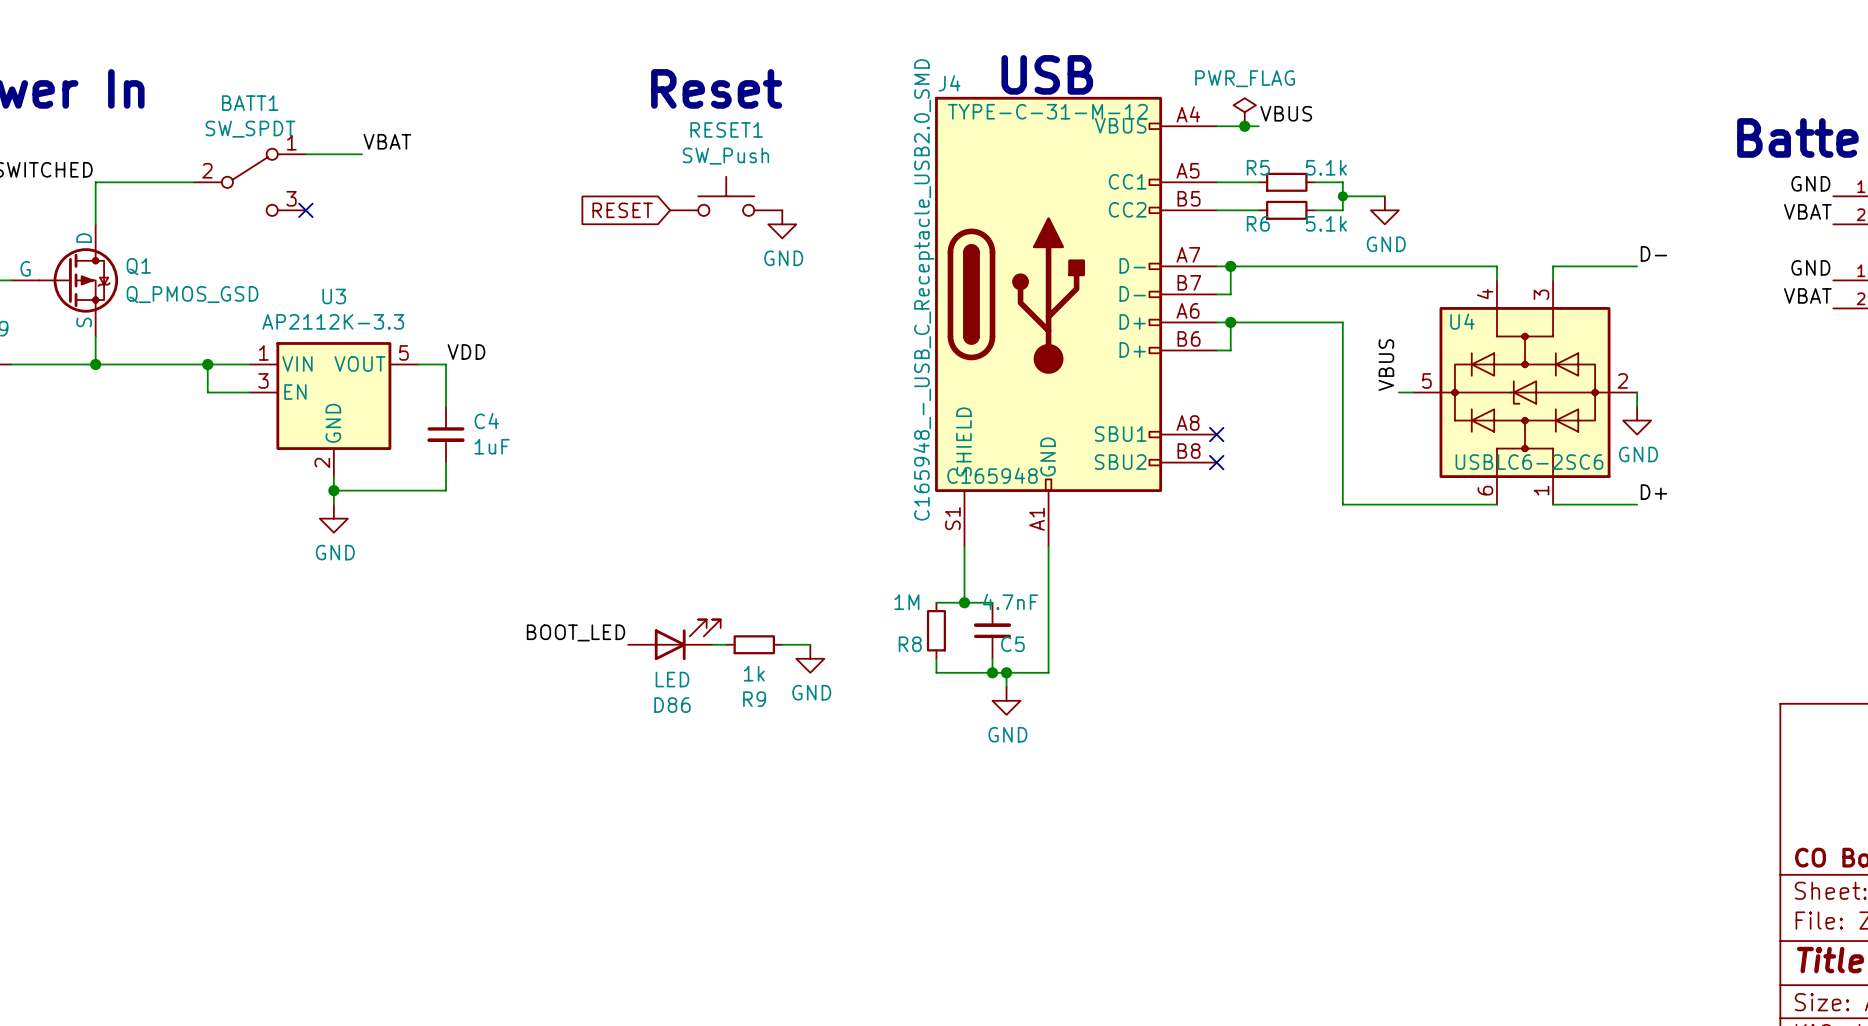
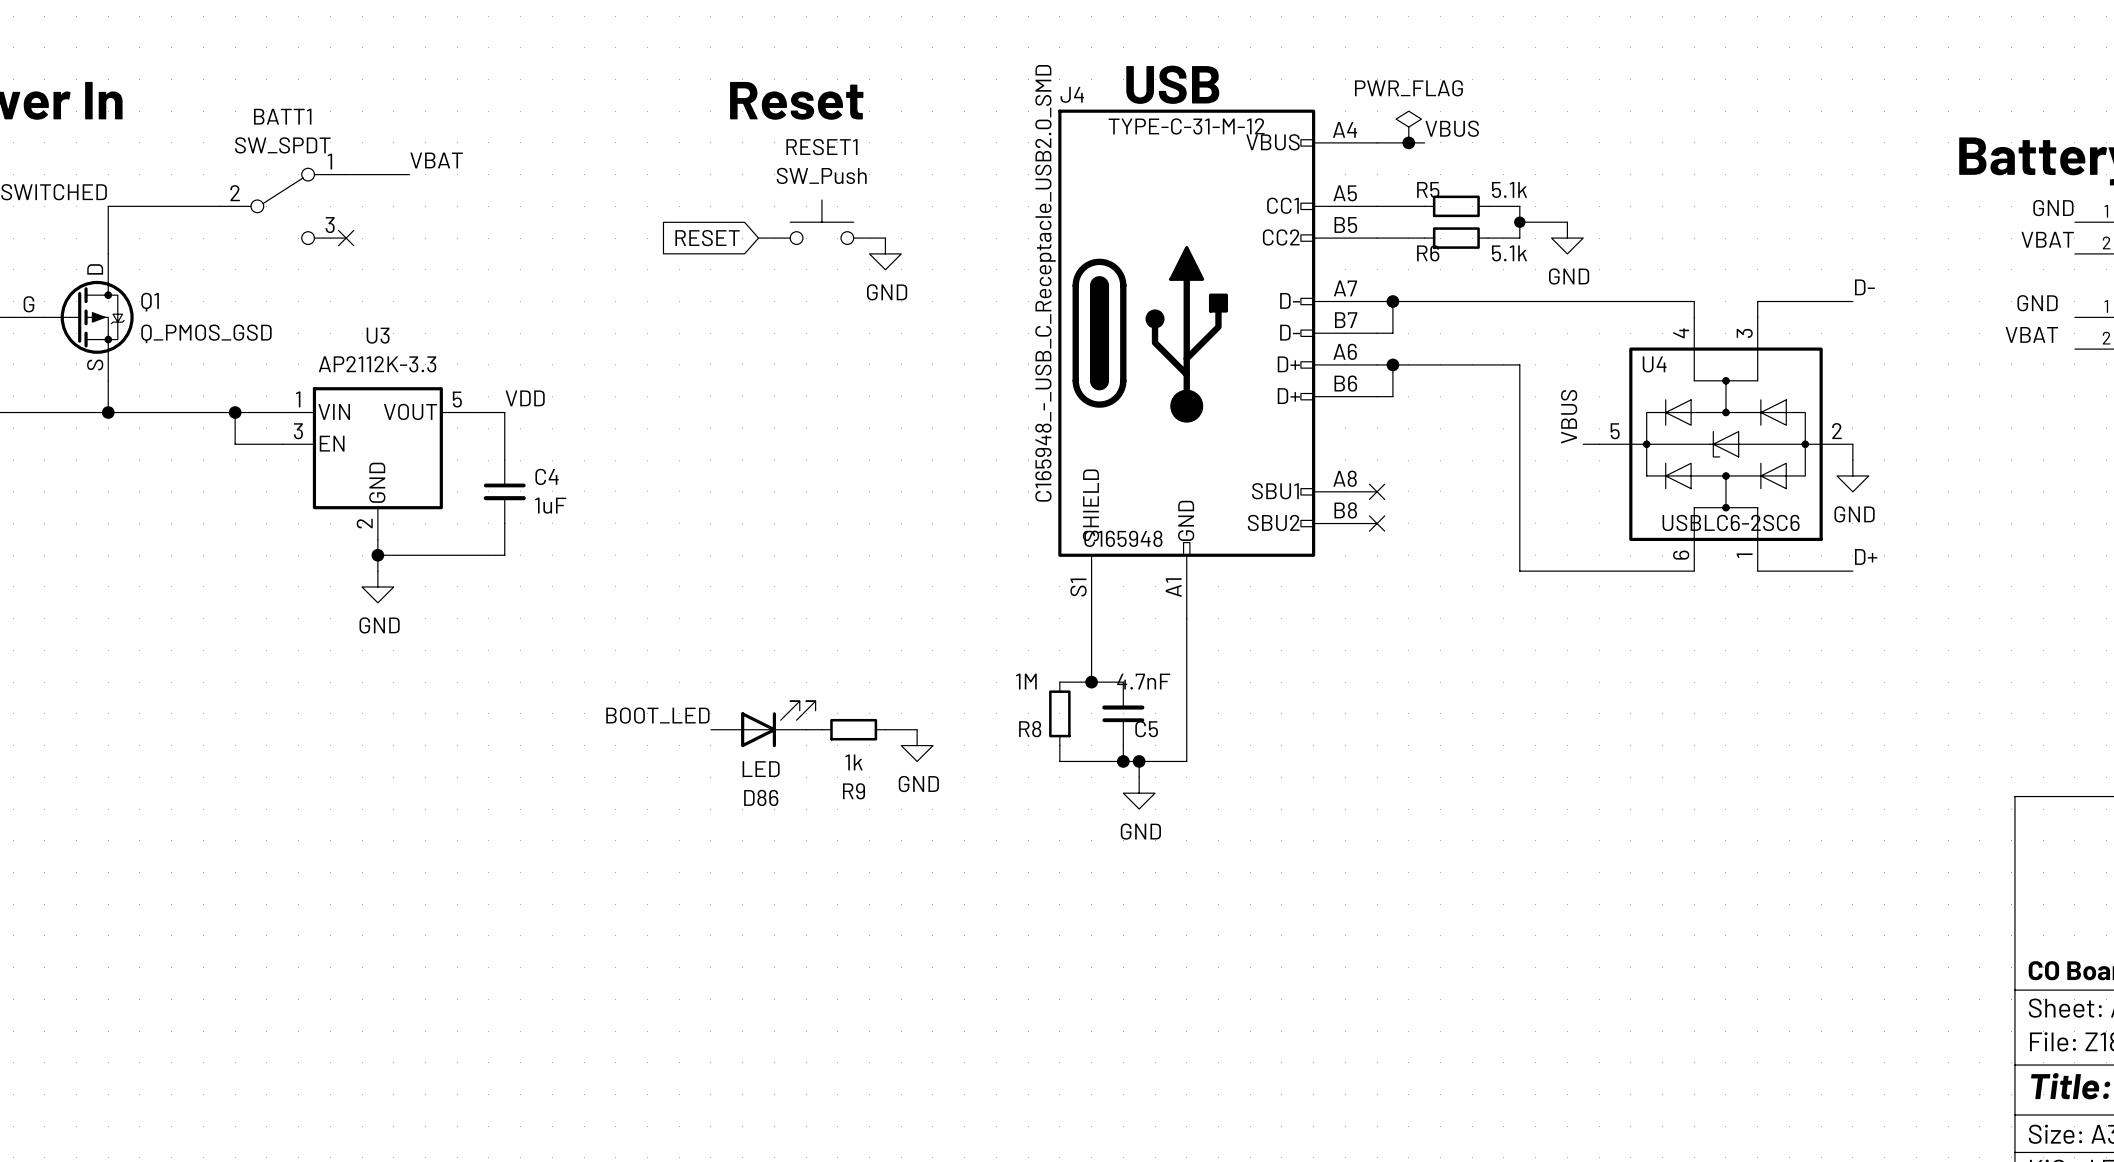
label position: GND (1810, 267) -> GND (2037, 303)
label position: VBAT (1807, 295) -> VBAT (2031, 334)

